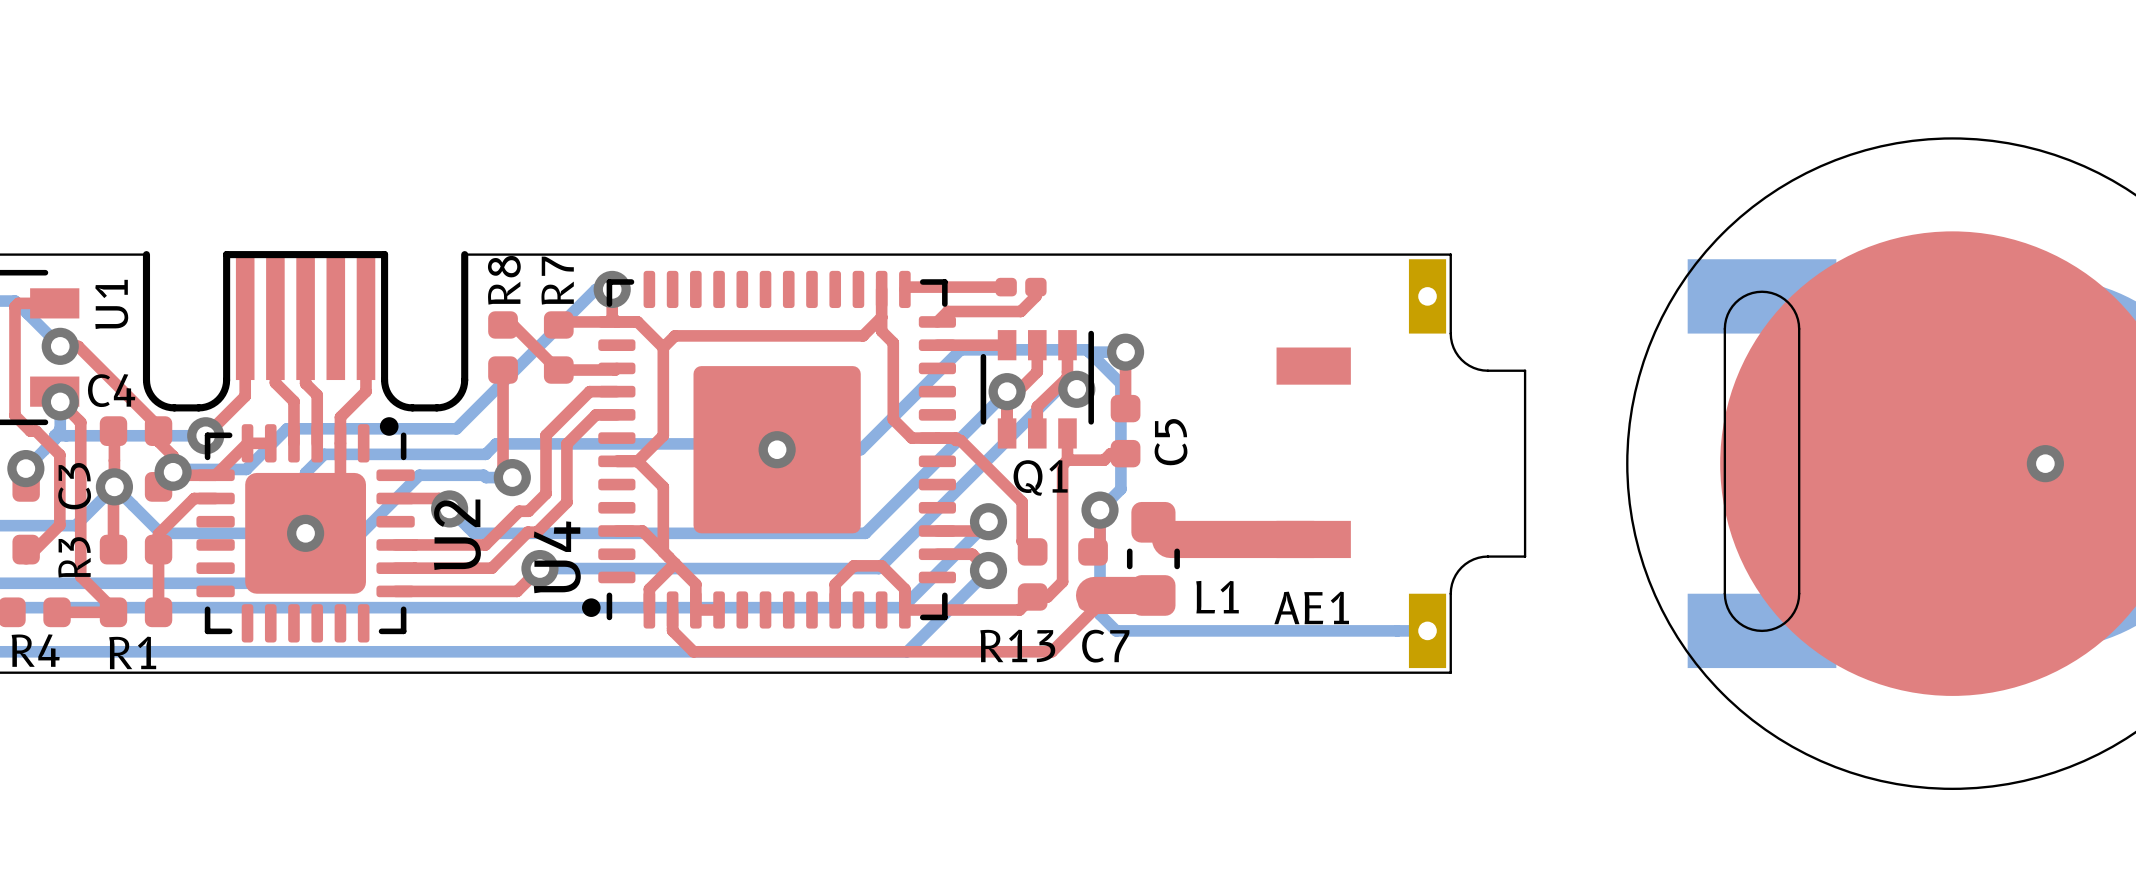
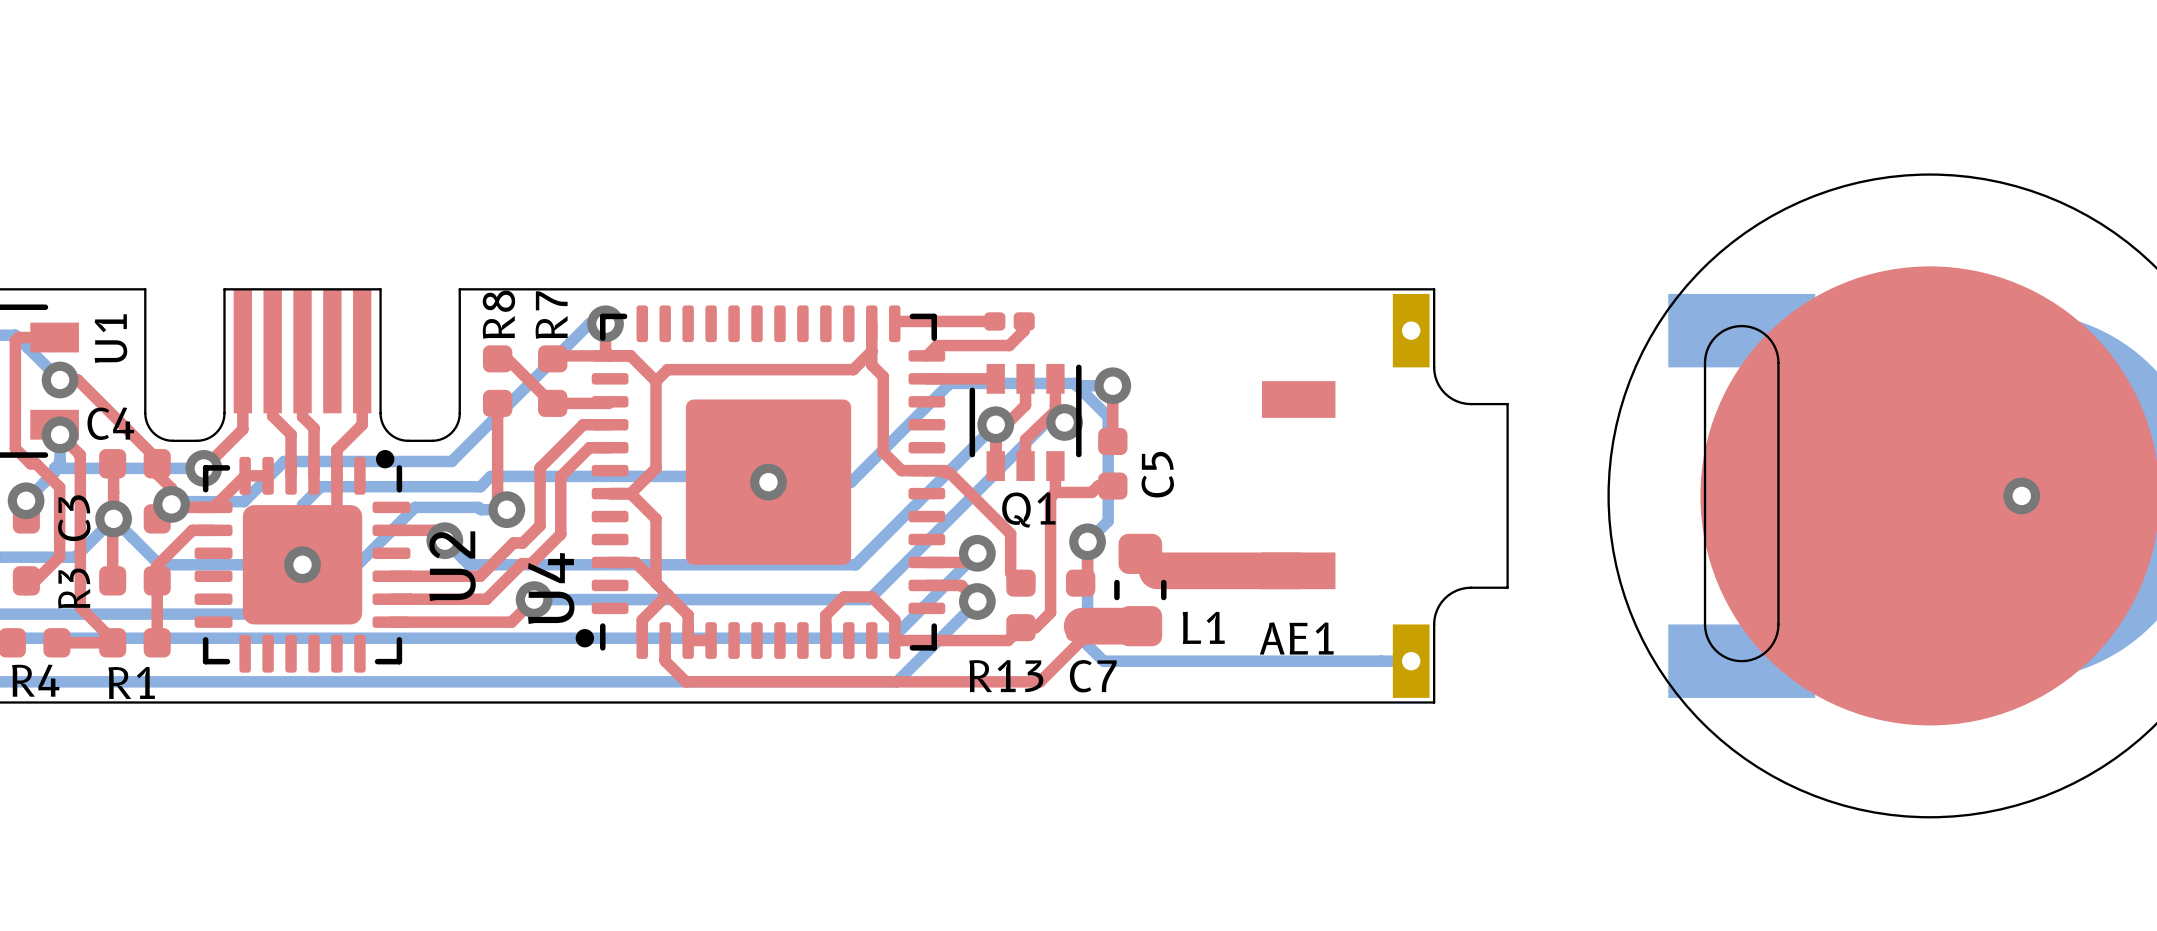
part footprint: [142, 251, 469, 412] -> [233, 289, 372, 414]

